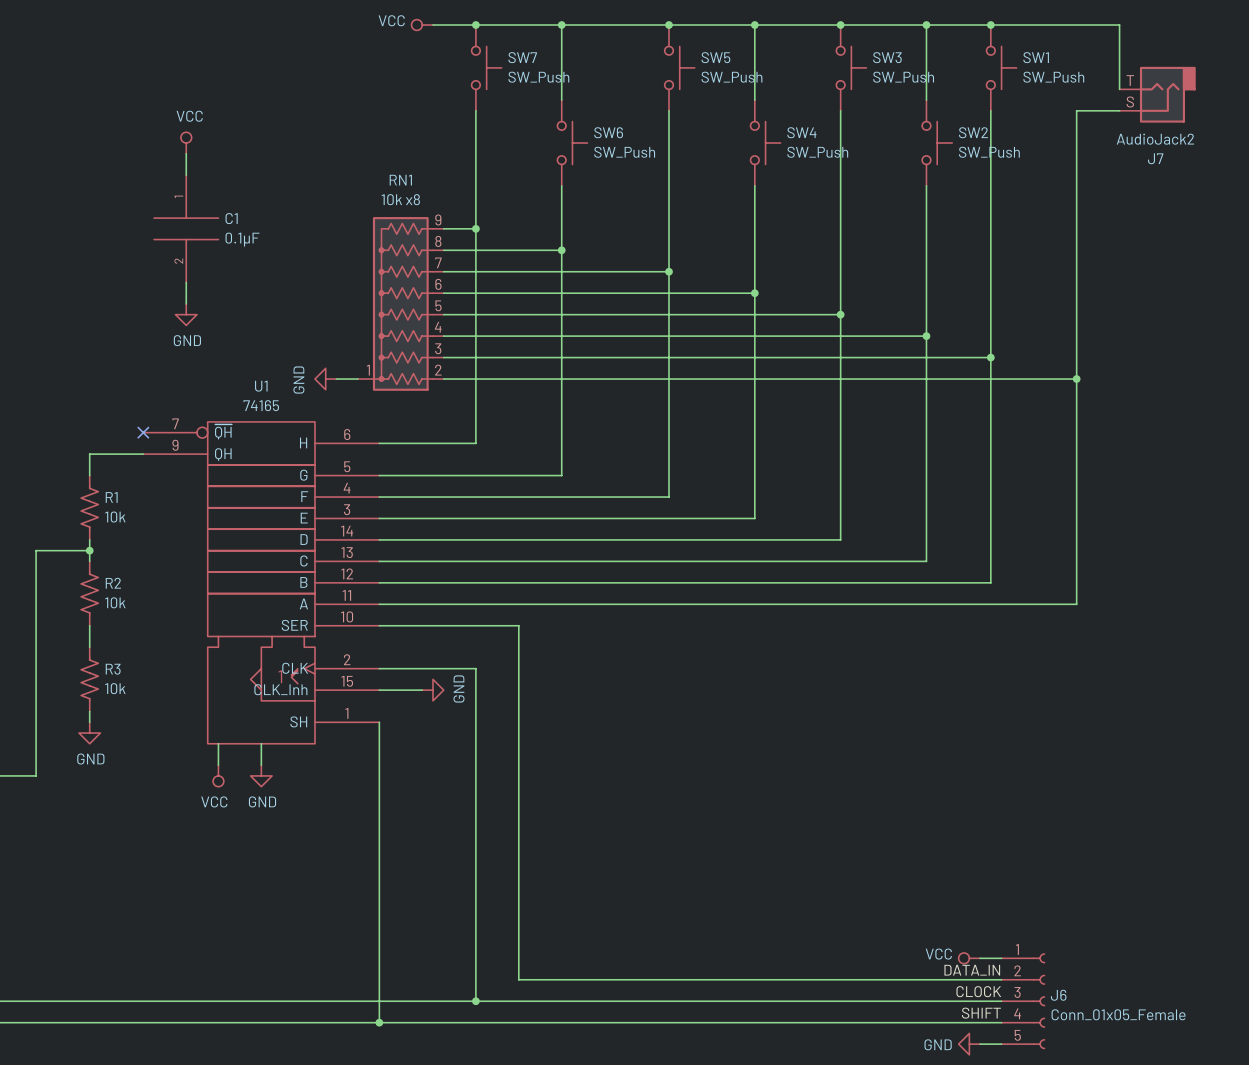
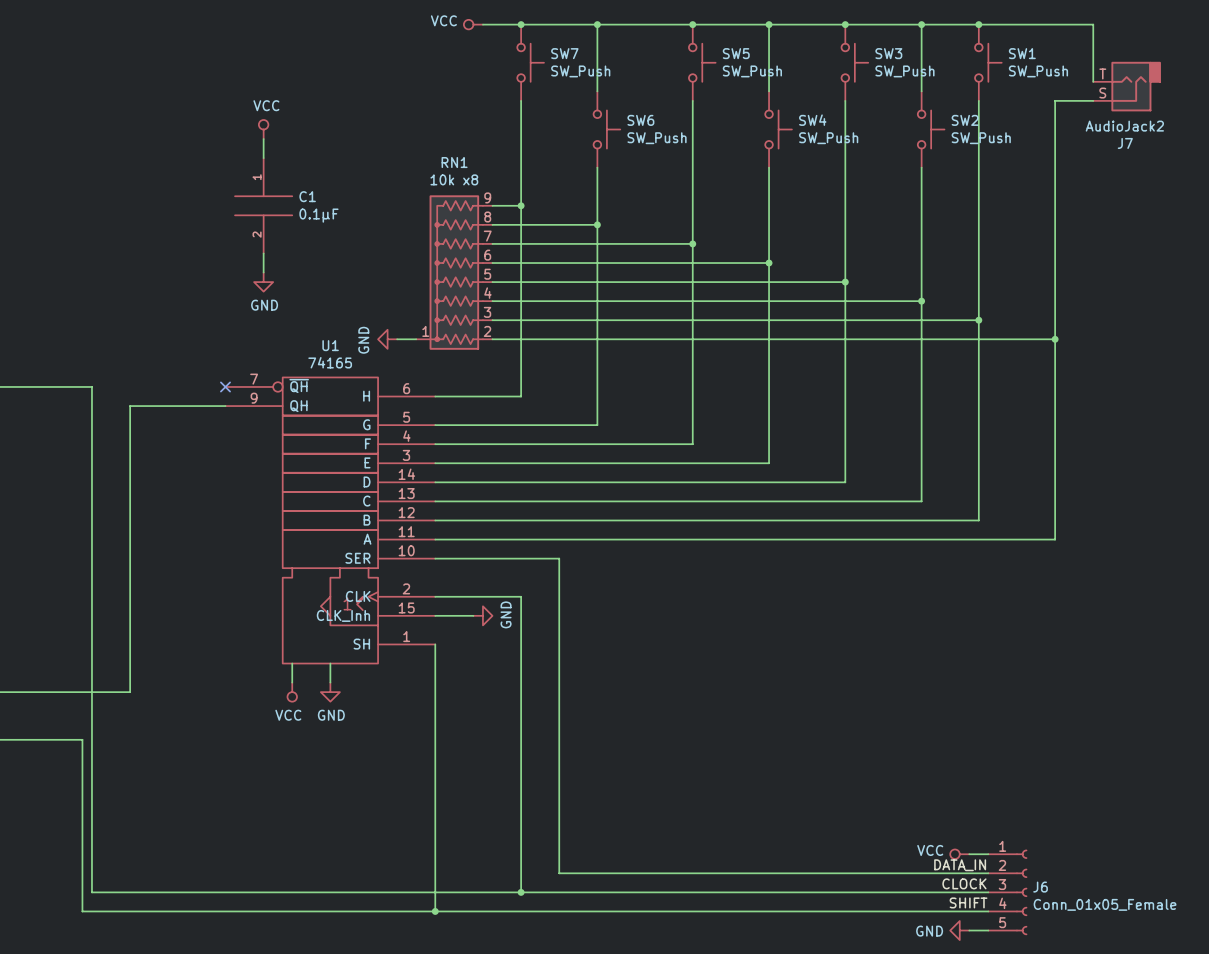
wire: (89, 454) (89, 475) -> (177, 406) (130, 406) (130, 491)
R1: 10k (89, 507) -> none
wire: (89, 539) (89, 561) -> none
wire: (36, 550) (89, 550) -> none
junction: (89, 550) -> none
R2: 10k (89, 593) -> none
wire: (89, 625) (89, 647) -> none
R3: 10k (89, 679) -> none
wire: (89, 711) (89, 722) -> none
power symbol: GND (89, 733) -> none

